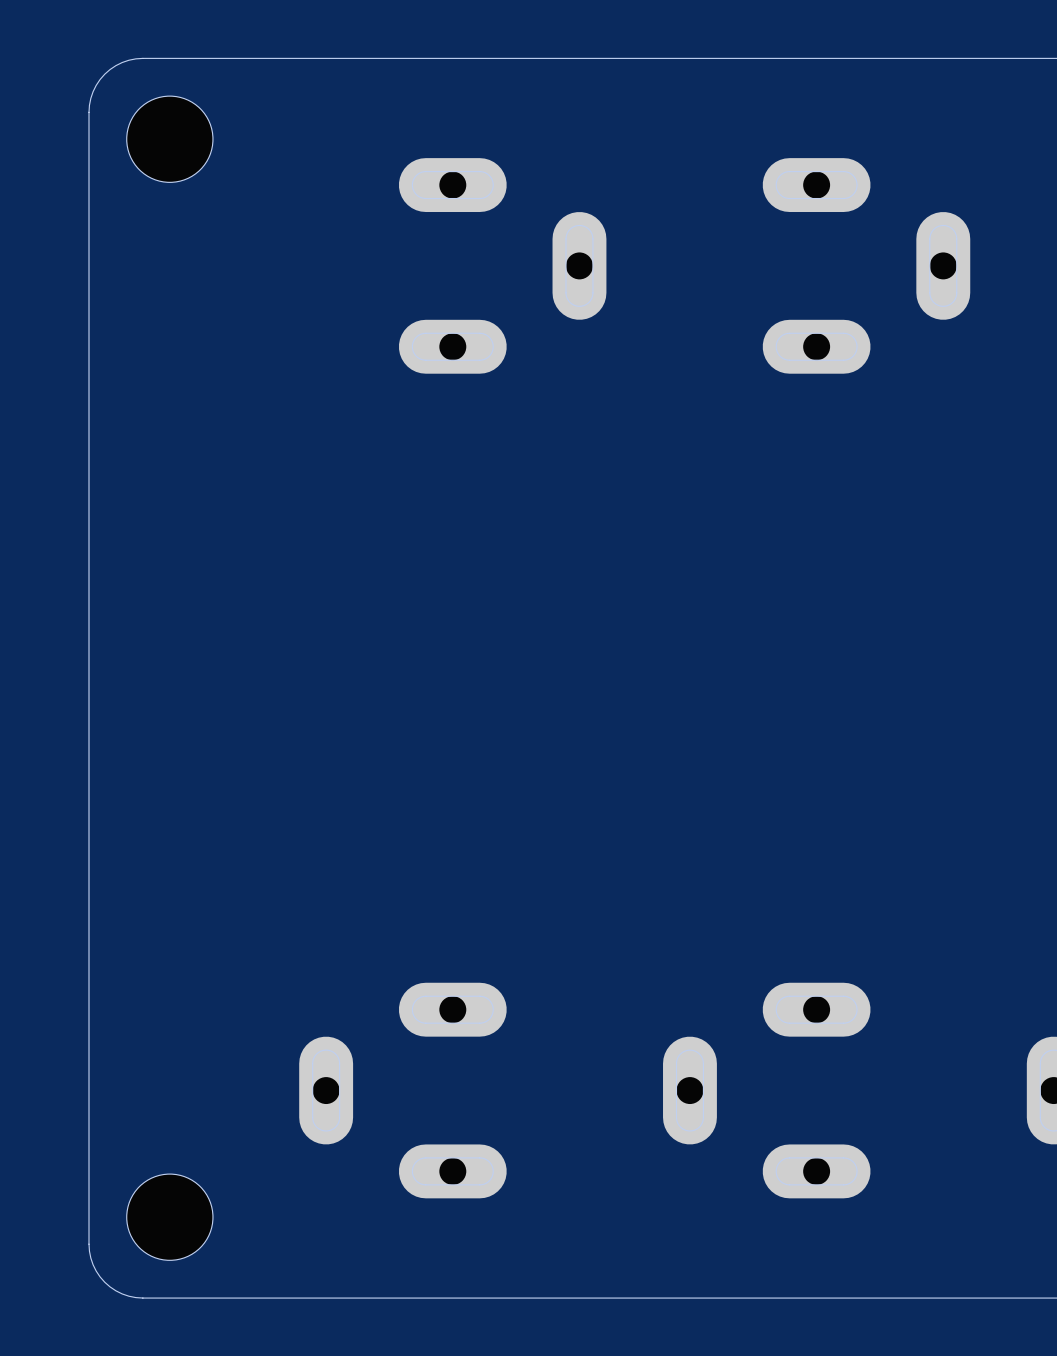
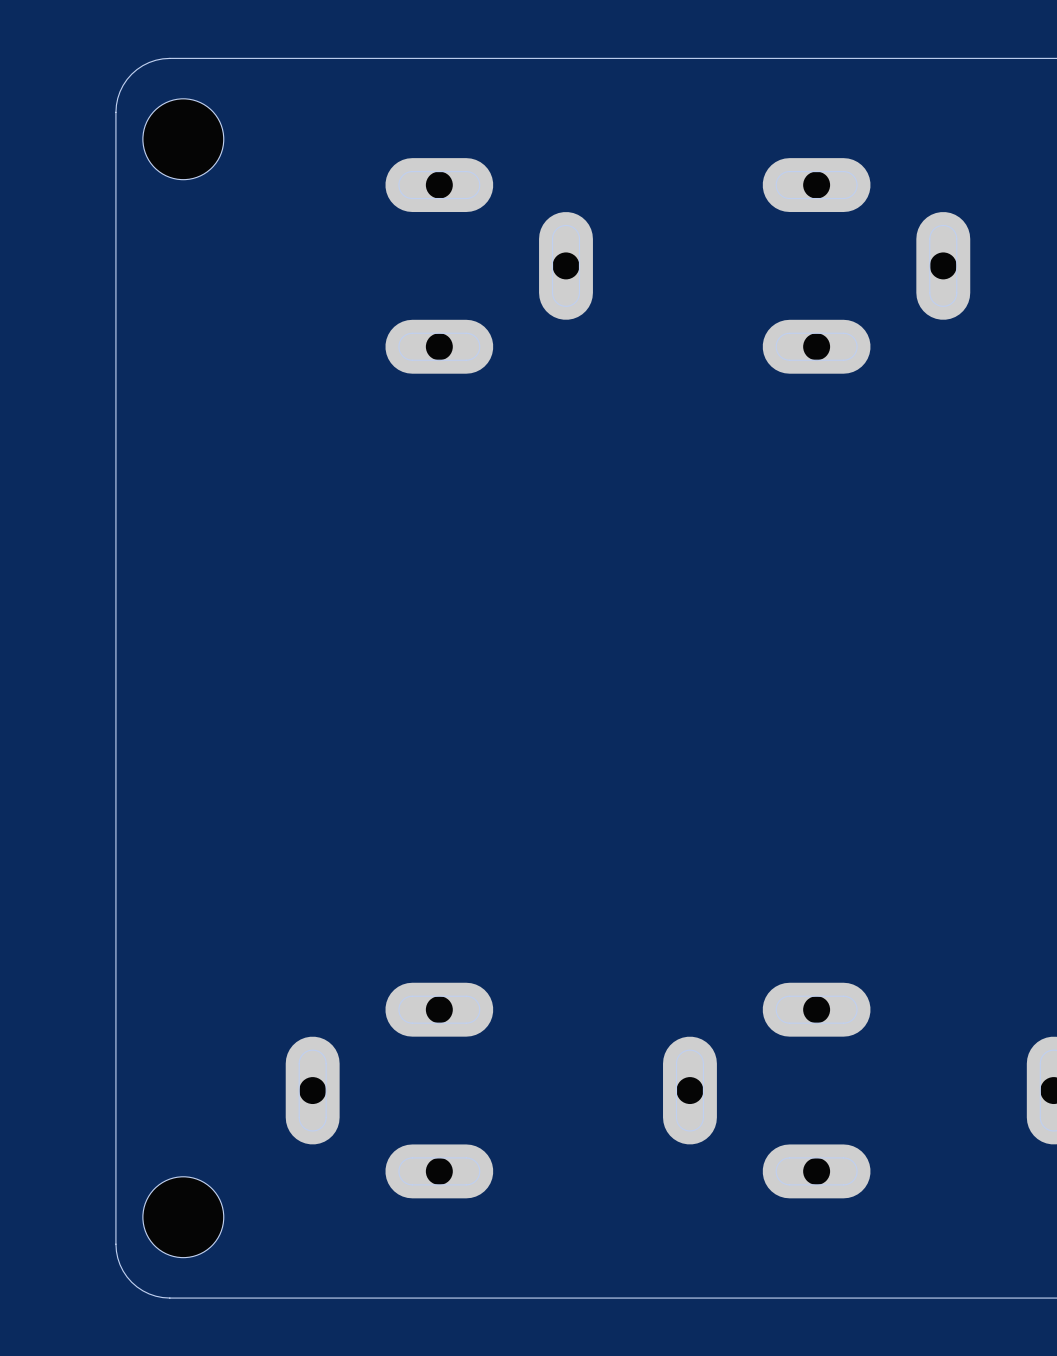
board edge: (169, 58) (135, 58) (115, 65) (104, 74) (96, 85) (90, 98) (89, 112) (89, 1251) (96, 1271) (104, 1282) (115, 1290) (135, 1297) (169, 1298) -> (169, 58) (149, 62) (131, 74) (120, 91) (115, 112) (115, 1244) (120, 1264) (131, 1282) (149, 1293) (169, 1298)
hole position: (169, 139) -> (183, 139)
part position: (502, 265) -> (489, 265)
part position: (402, 1090) -> (389, 1090)
hole position: (169, 1217) -> (183, 1217)

